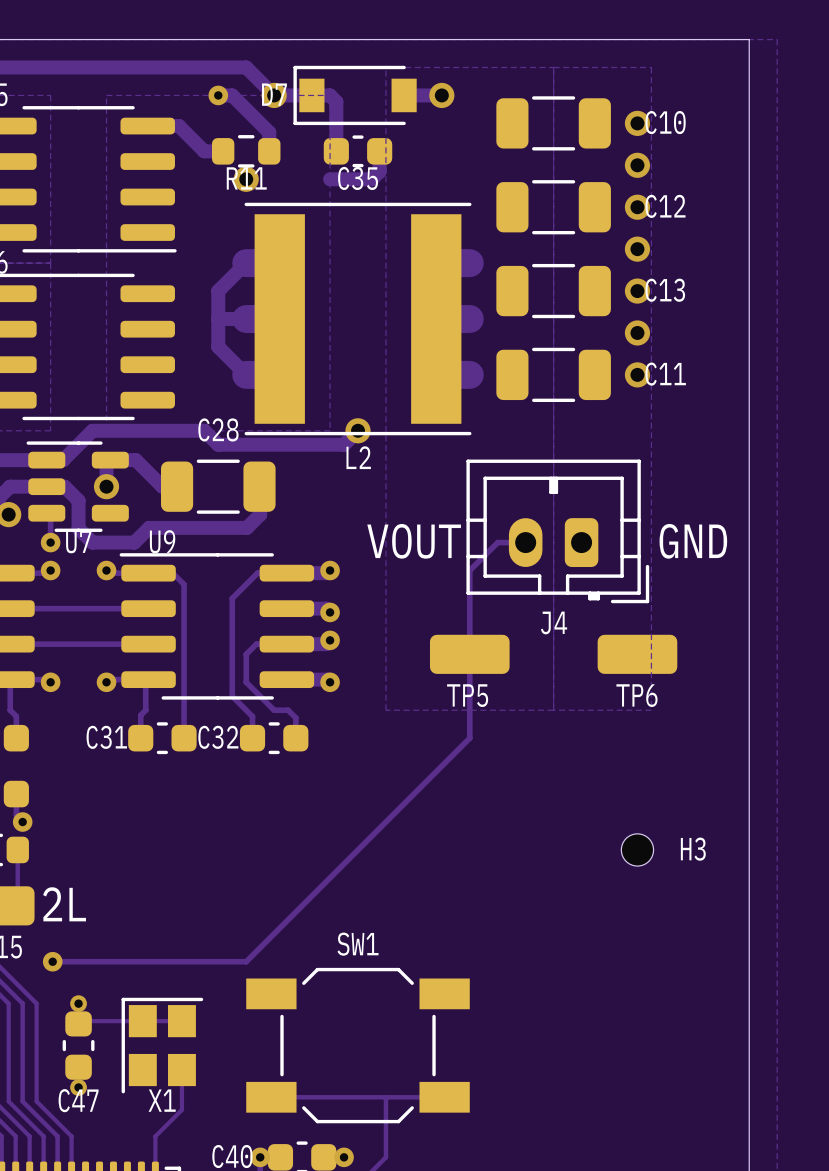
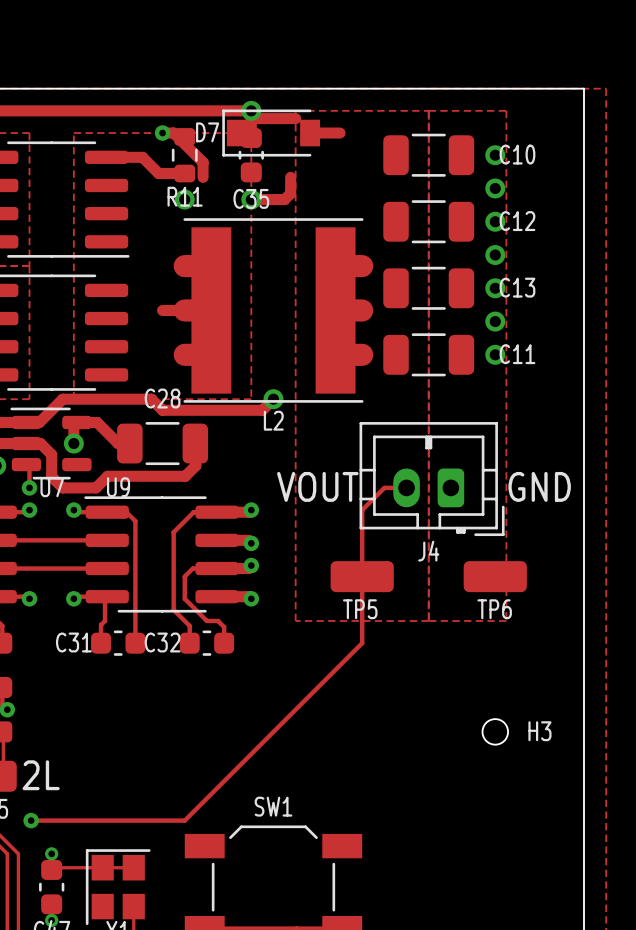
track: (246, 67) (274, 95) (330, 95) (336, 101) (336, 151) -> (184, 110) (251, 110) (251, 138)
via: none -> (251, 110)
track: none -> (295, 118) (254, 118) (251, 121)
via: (274, 95) -> none
via: (441, 95) -> none
track: (179, 126) (204, 151) (223, 151) -> (131, 157) (142, 157) (158, 173) (184, 173)
R11 rotation: 0° (246, 151) -> 90° clockwise (184, 155)
C35 rotation: 0° (358, 151) -> 90° clockwise (251, 155)
via: none -> (251, 199)
track: (246, 263) (218, 291) (218, 346) (246, 374) -> none

